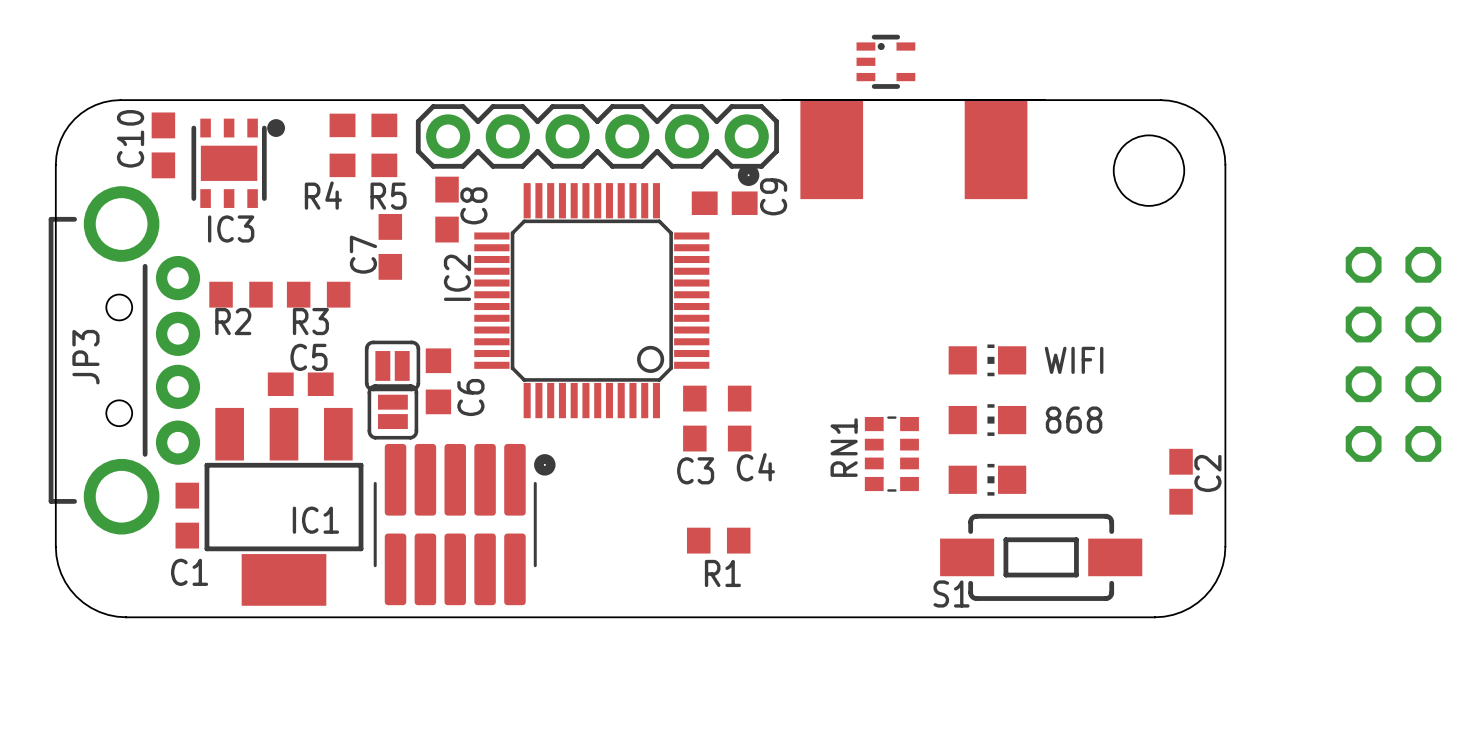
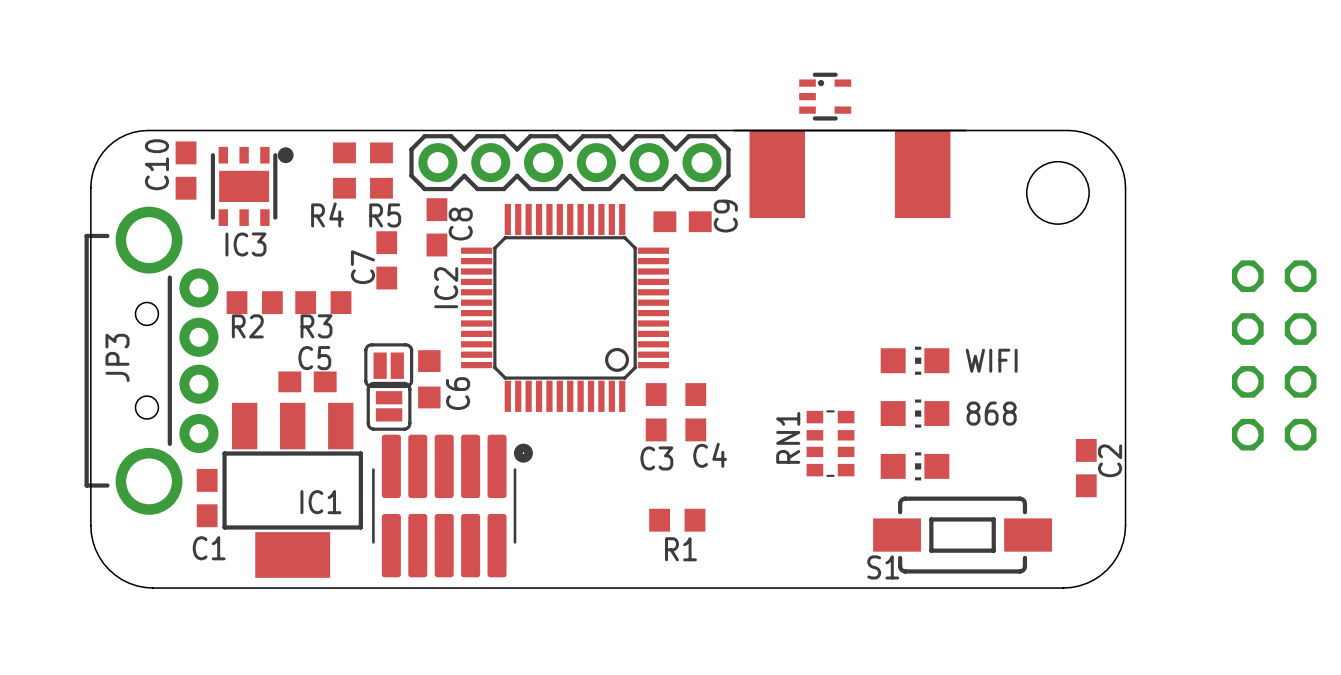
drawing: [737, 164, 760, 186] -> none

